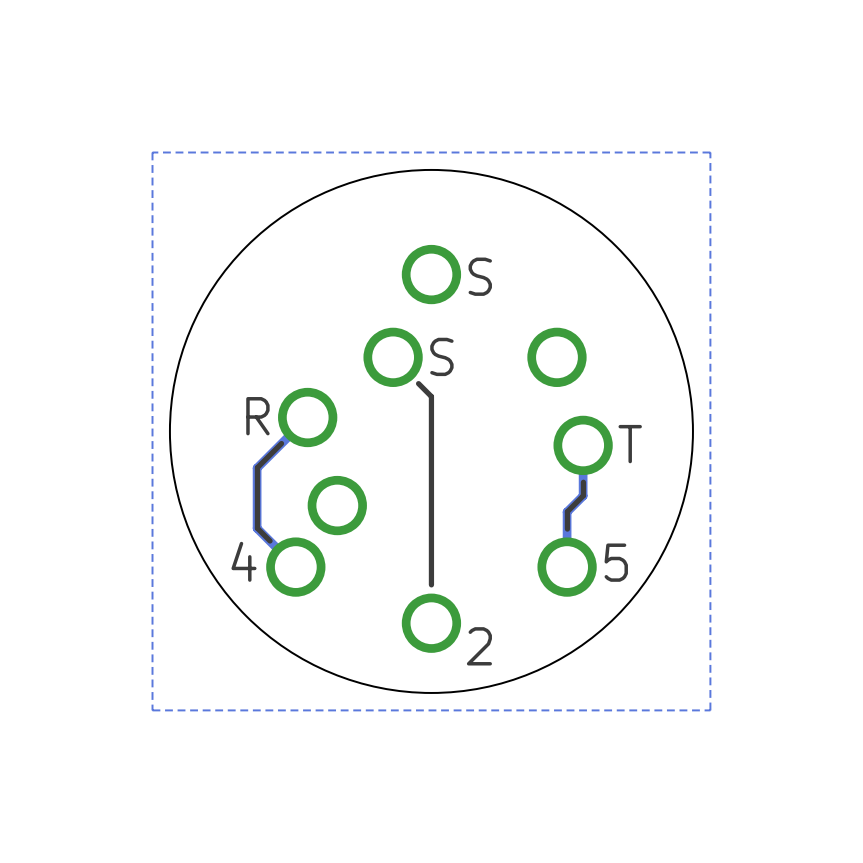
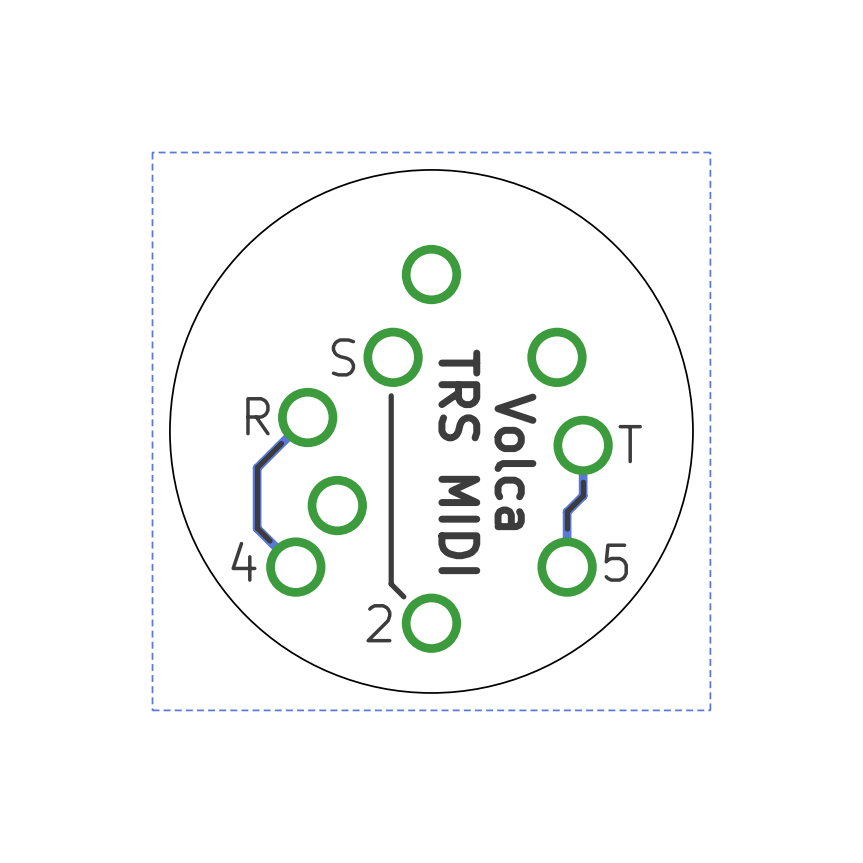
text: S (480, 276) -> none
text: S (441, 356) -> none
text: none -> S (343, 357)
line: (418, 383) (431, 396) (431, 584) -> none
line: none -> (391, 395) (391, 584) (403, 596)
text: none -> TRS MIDI (459, 461)
text: none -> Volca (515, 461)
text position: 2 (479, 646) -> 2 (378, 623)

